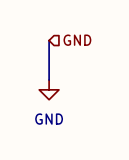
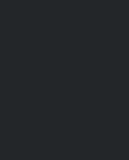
wire: (49, 40) (49, 80) -> none
hierarchical label: GND (77, 40) -> none
power symbol: GND (49, 89) -> none

